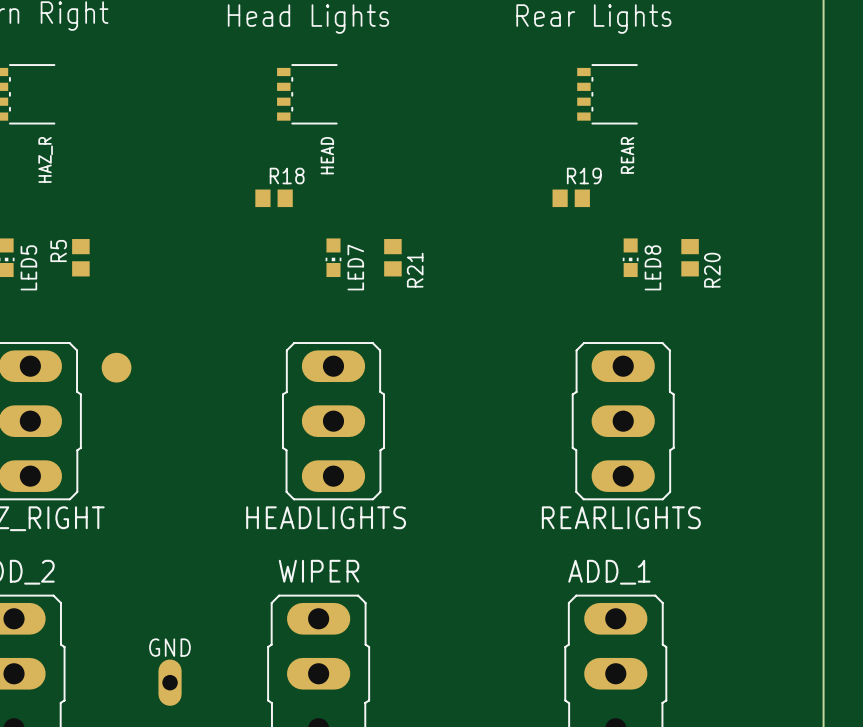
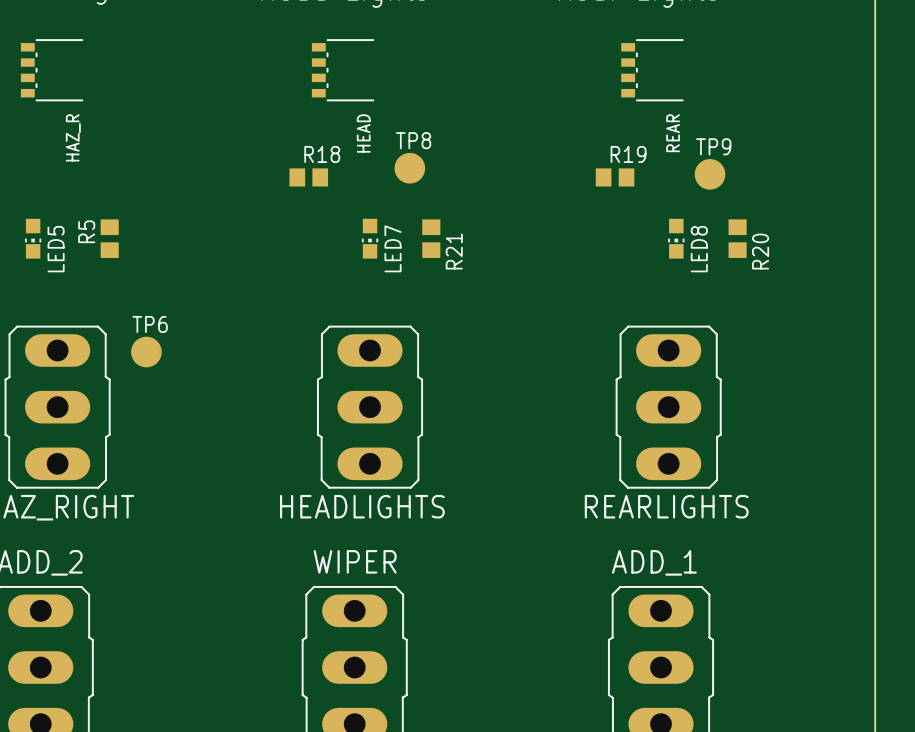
TP8: none -> (409, 168)
TP9: none -> (710, 174)
TP6 name: none -> TP6 (150, 324)
text: GND (169, 647) -> none
part: (170, 682) -> none

